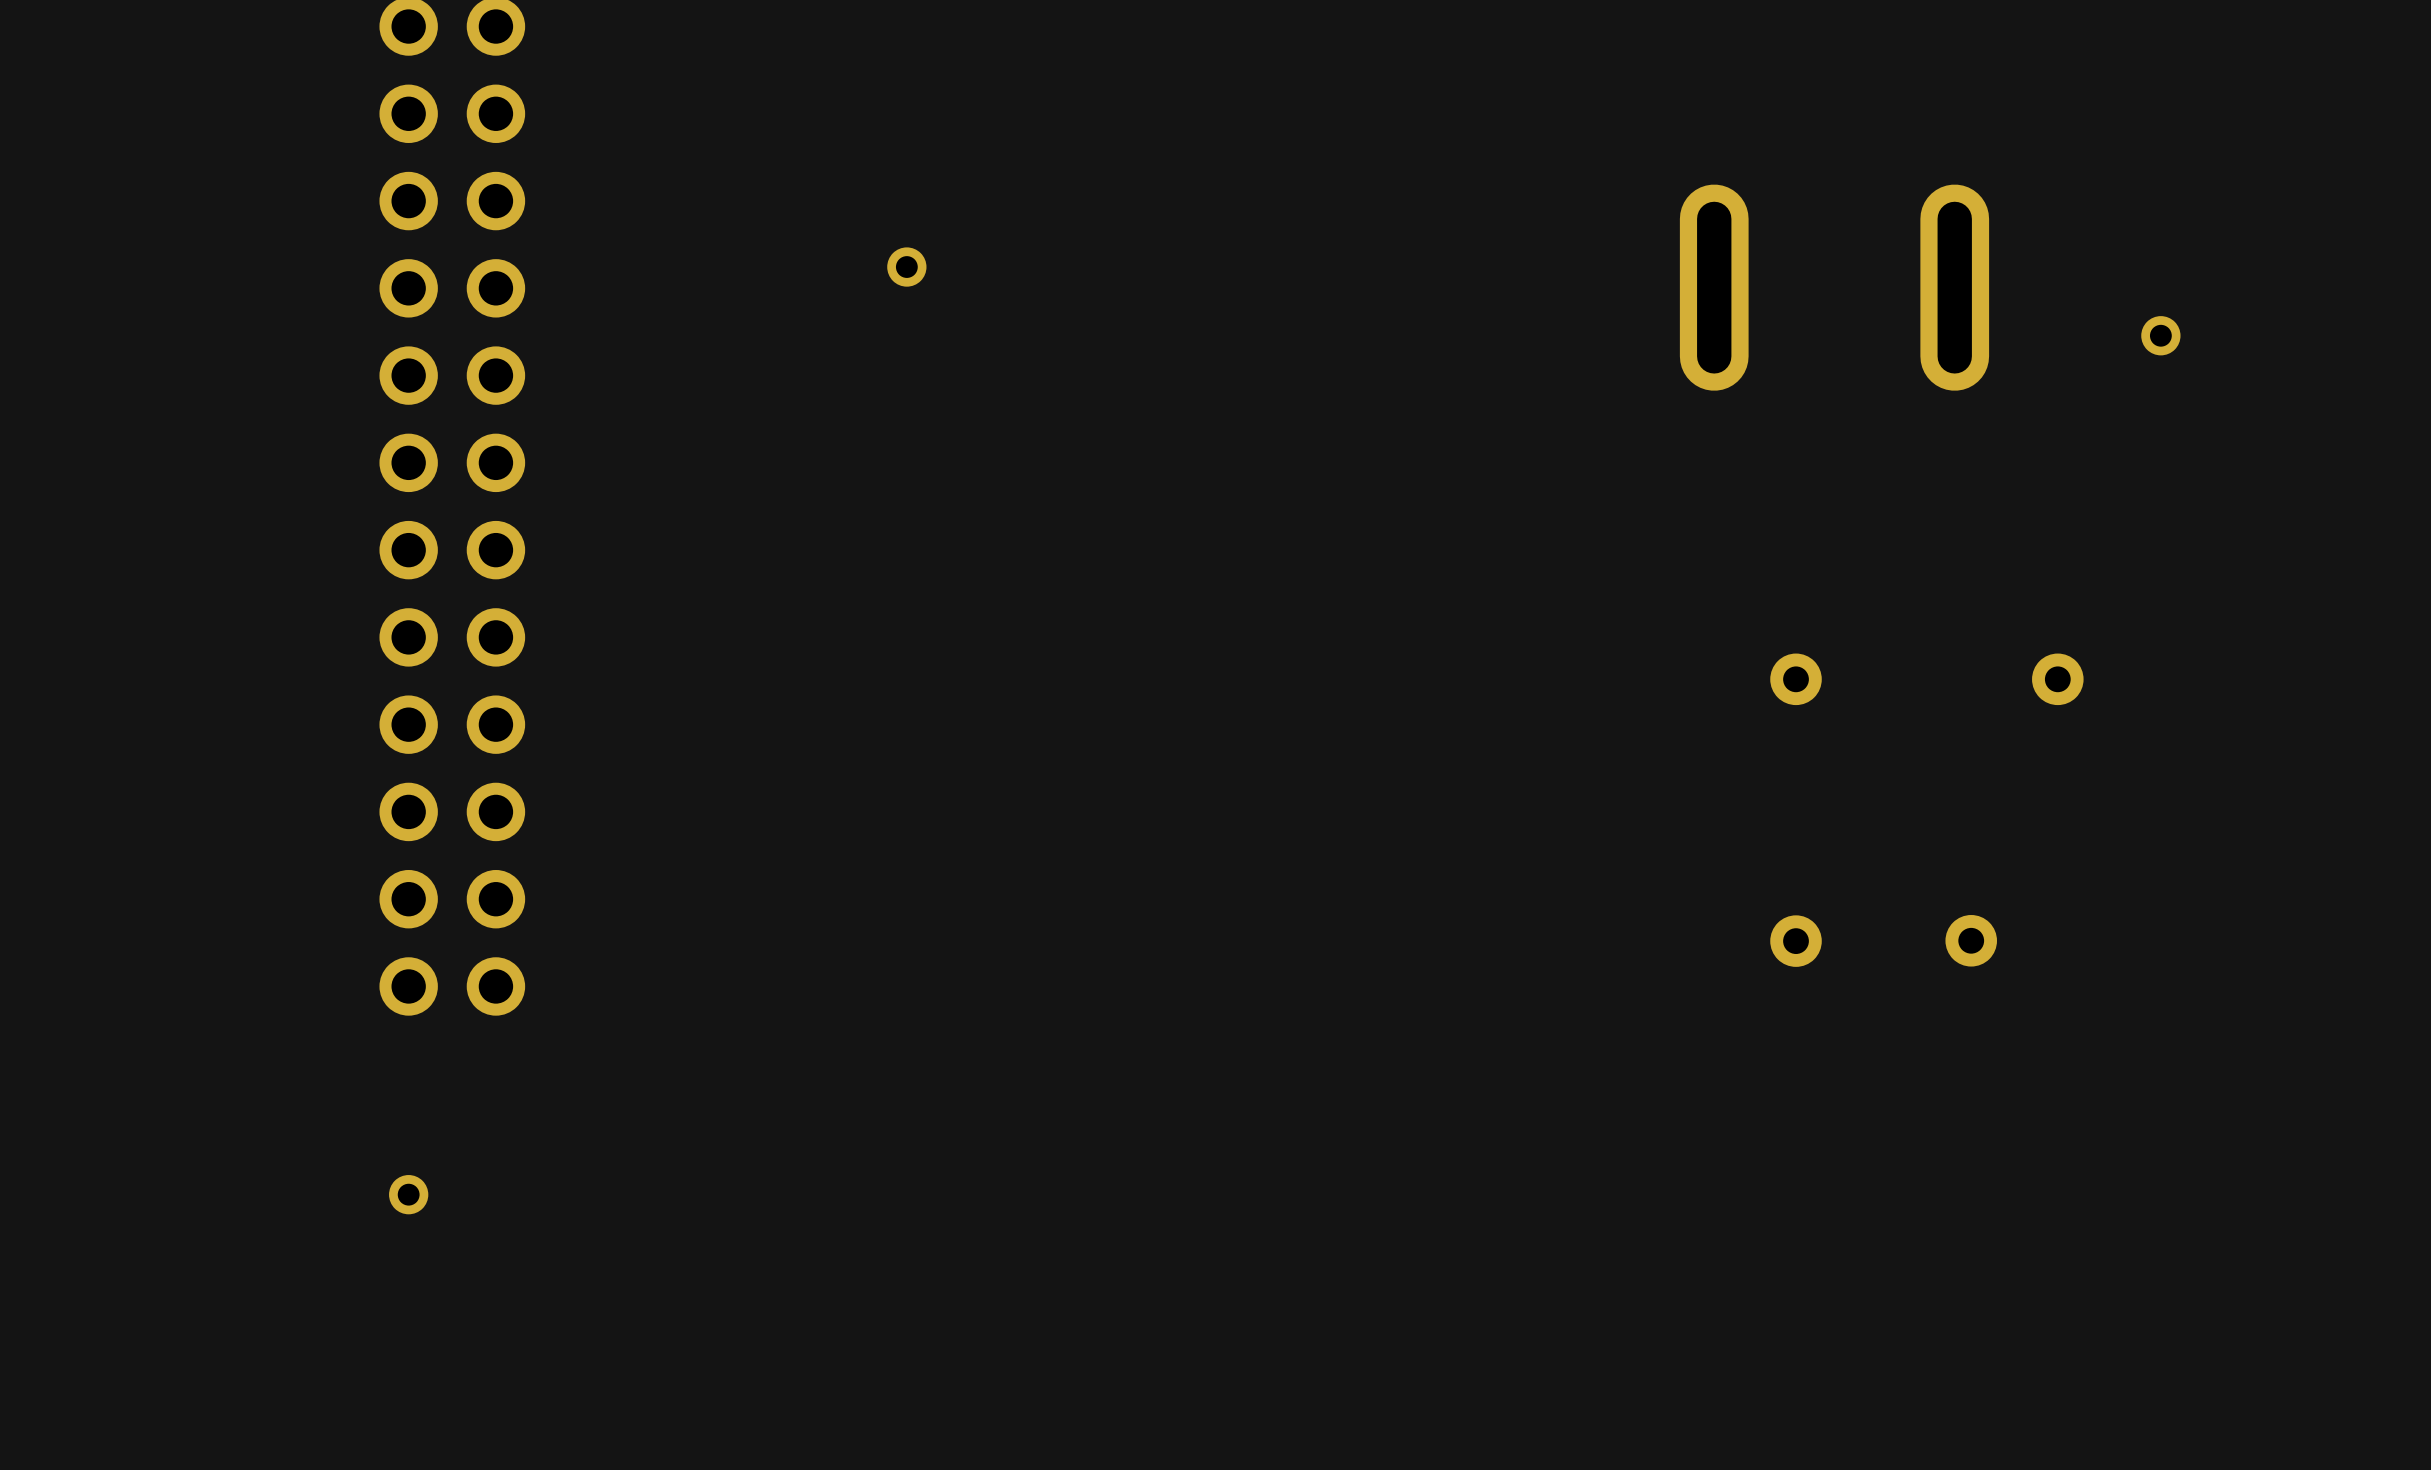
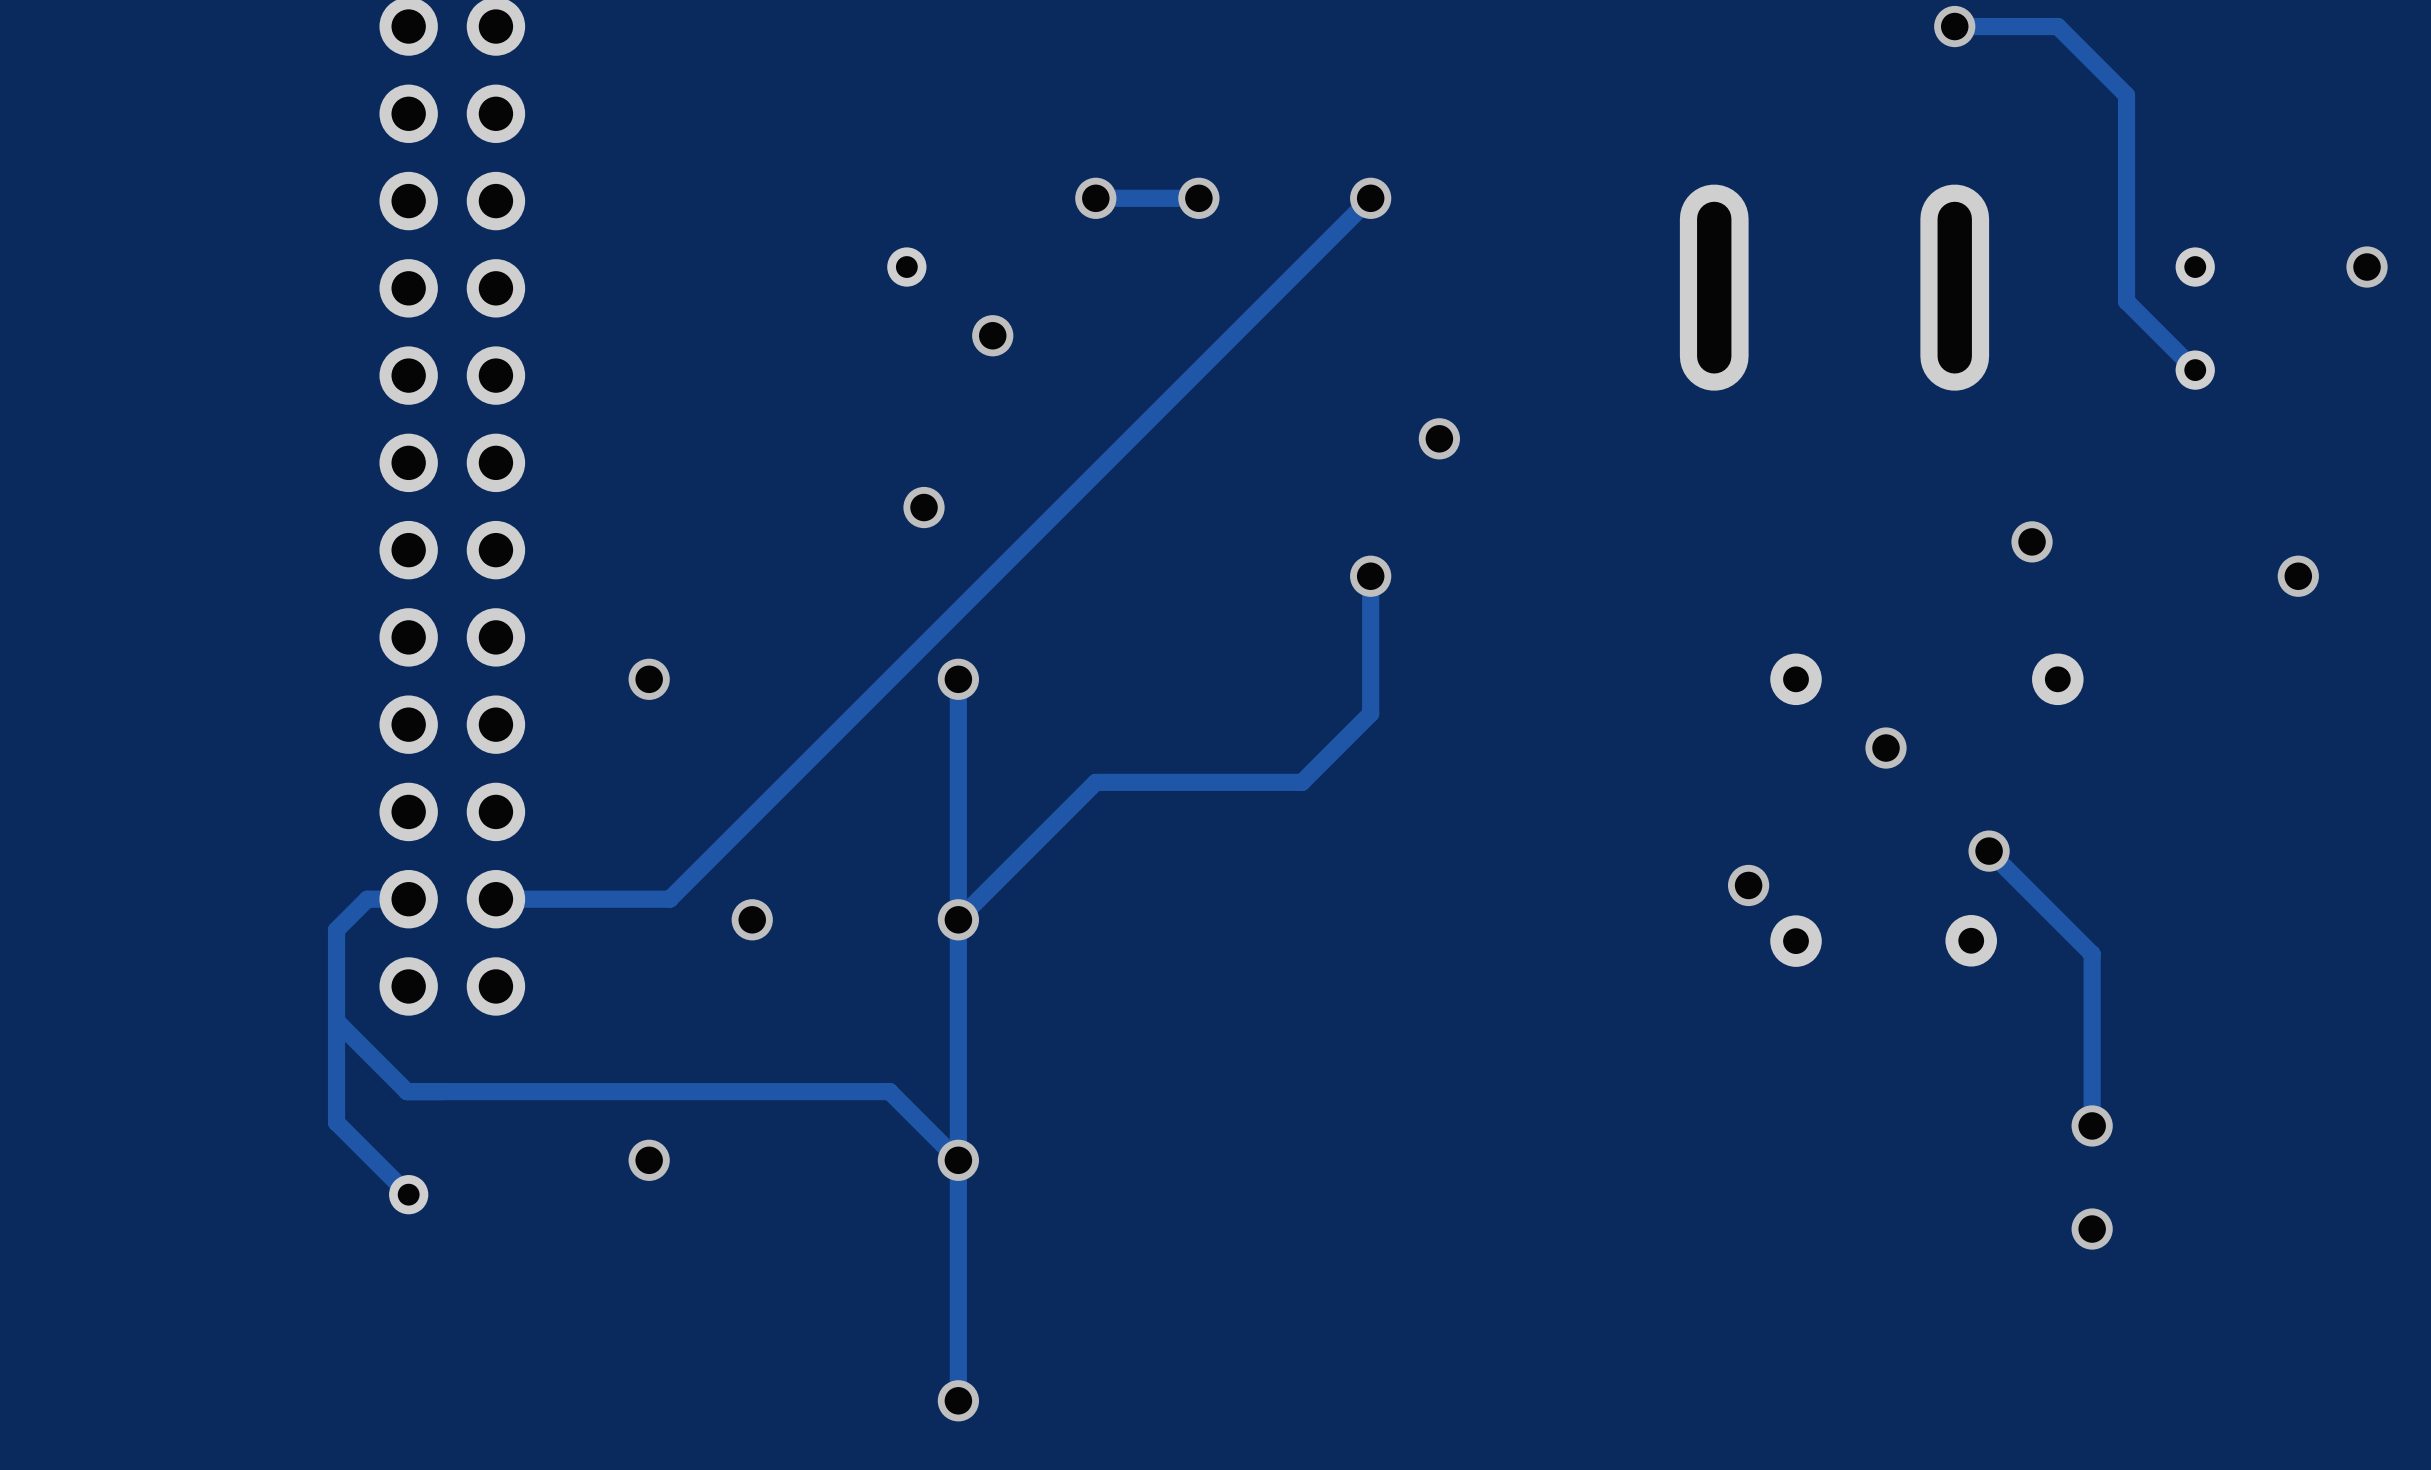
track: none -> (1954, 26) (2057, 26) (2126, 95) (2126, 301) (2195, 370)
via: none -> (1954, 26)
via: none -> (1095, 198)
track: none -> (1198, 198) (1095, 198)
via: none -> (1198, 198)
track: none -> (1370, 198) (669, 899) (495, 899)
via: none -> (1370, 198)
part: none -> (2195, 267)
via: none -> (2367, 267)
via: none -> (992, 335)
part: (2160, 335) -> none
part: none -> (2195, 370)
via: none -> (1439, 438)
via: none -> (924, 507)
via: none -> (2032, 541)
track: none -> (1370, 576) (1370, 713) (1301, 782) (1095, 782) (958, 919)
via: none -> (1370, 576)
via: none -> (2298, 576)
via: none -> (649, 679)
track: none -> (958, 679) (958, 1400)
via: none -> (958, 679)
via: none -> (1886, 748)
track: none -> (1989, 851) (2092, 954) (2092, 1125)
via: none -> (1989, 851)
via: none -> (1748, 885)
track: none -> (408, 899) (367, 899) (336, 930) (336, 1122) (408, 1194)
via: none -> (752, 919)
via: none -> (958, 919)
track: none -> (336, 1021) (407, 1091) (889, 1091) (958, 1160)
via: none -> (2092, 1125)
via: none -> (649, 1160)
via: none -> (958, 1160)
via: none -> (2092, 1229)
via: none -> (958, 1400)

